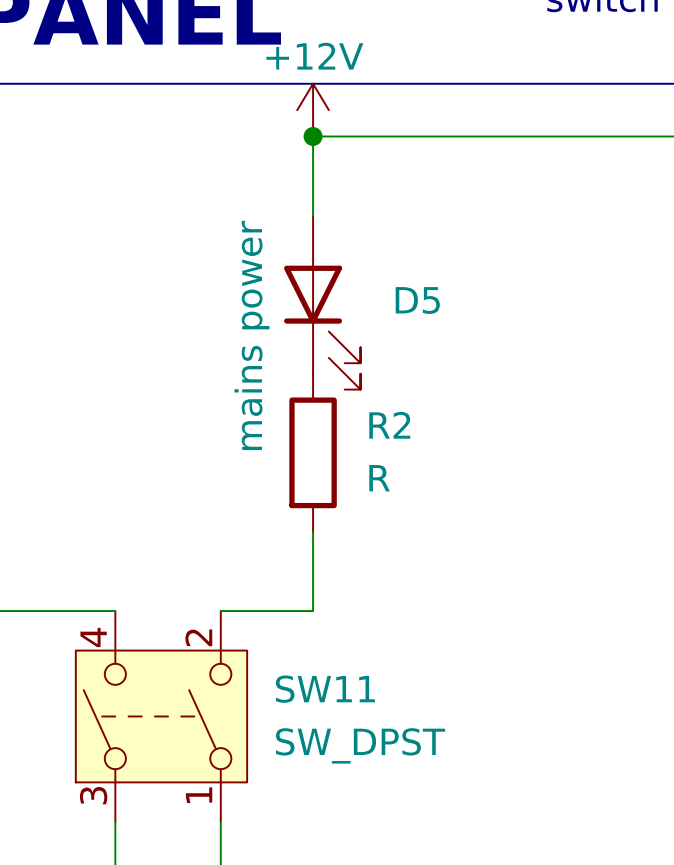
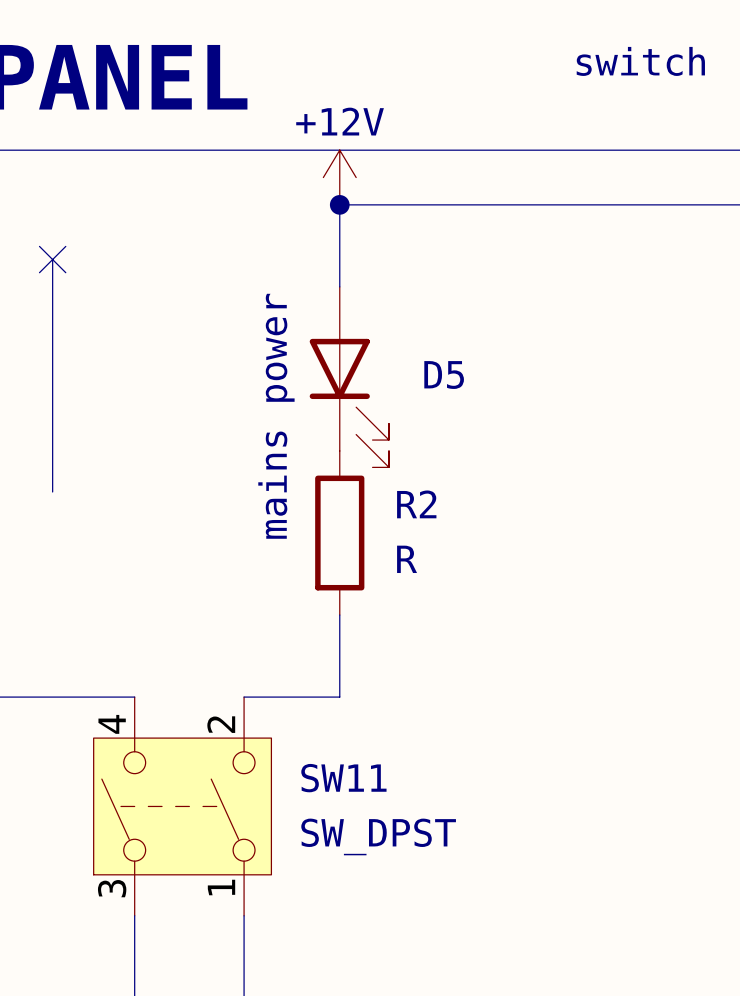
wire: none -> (52, 259) (52, 491)
no-connect mark: none -> (52, 259)

